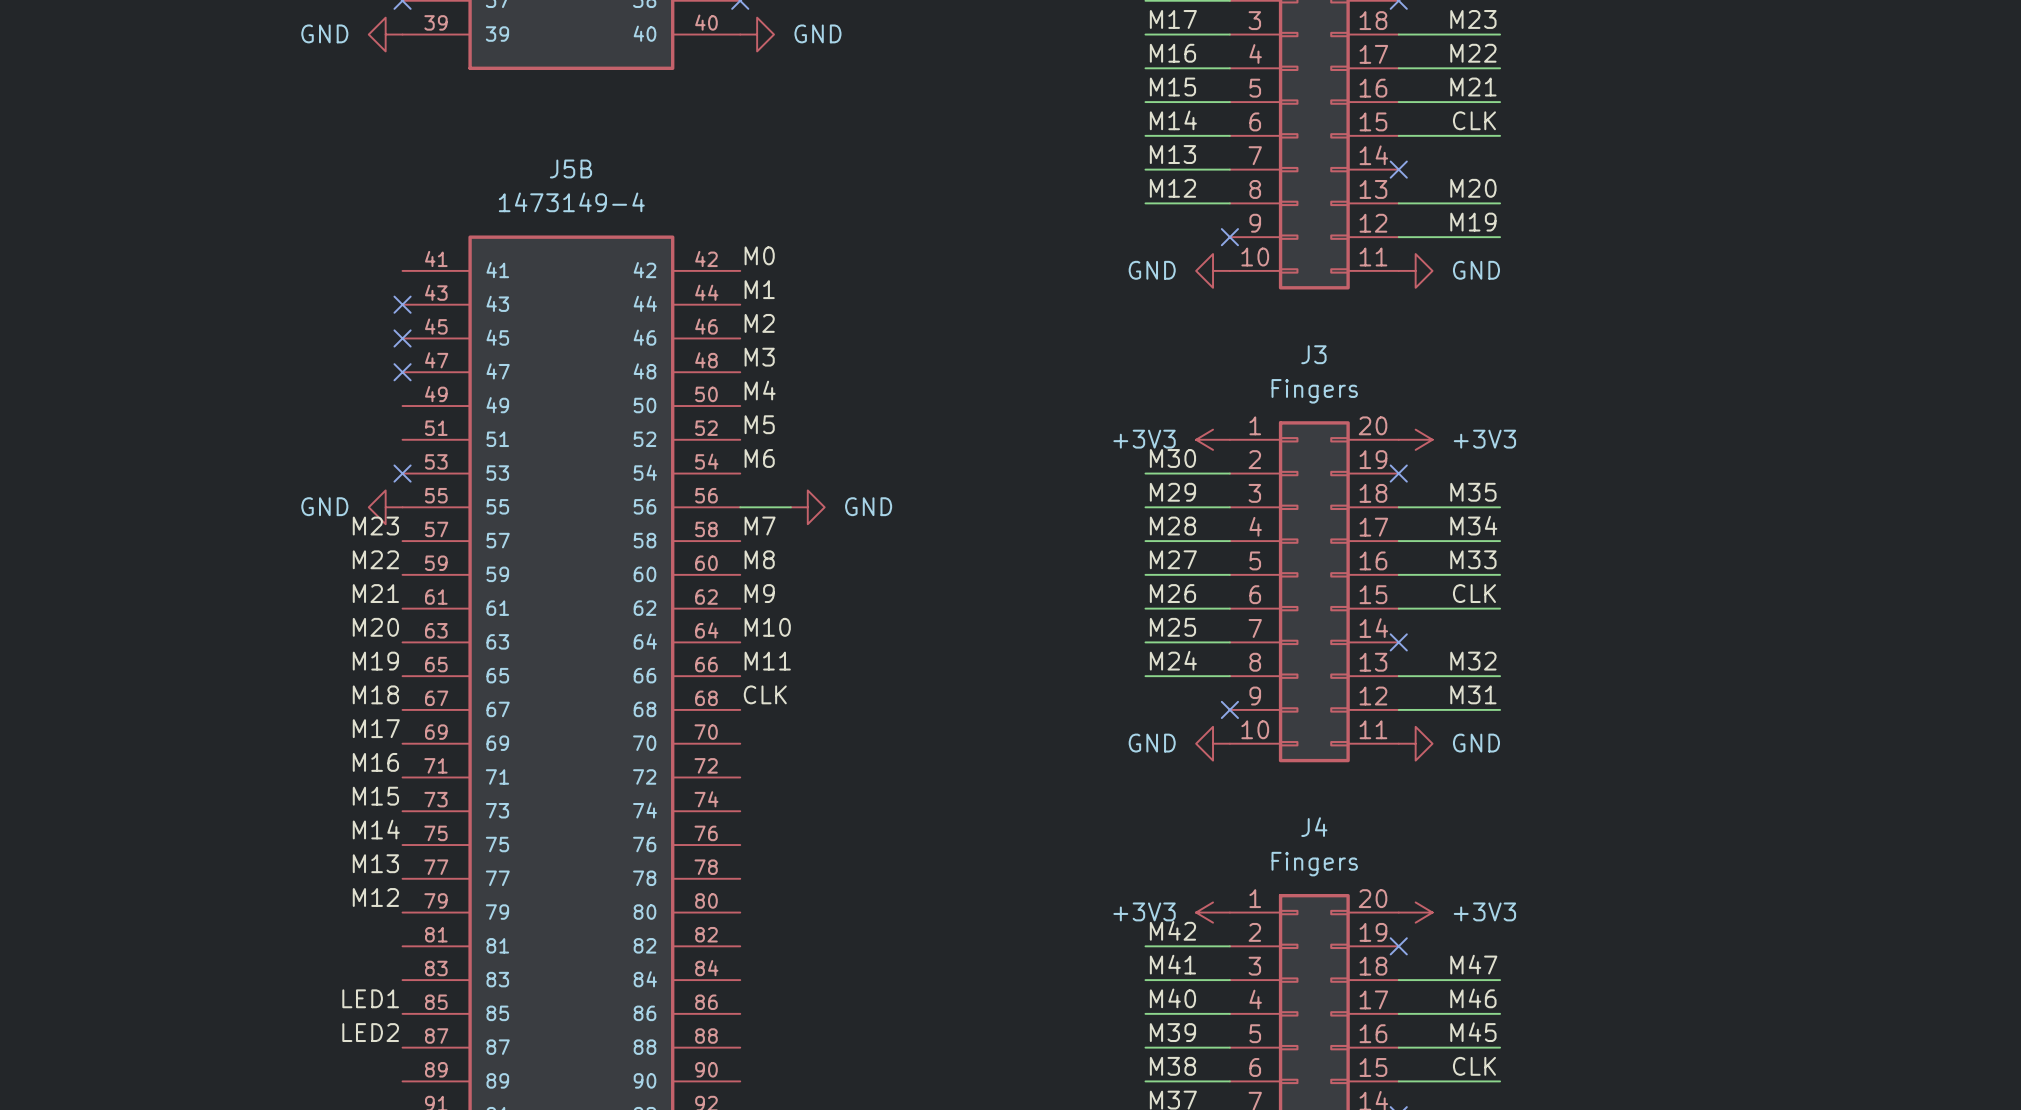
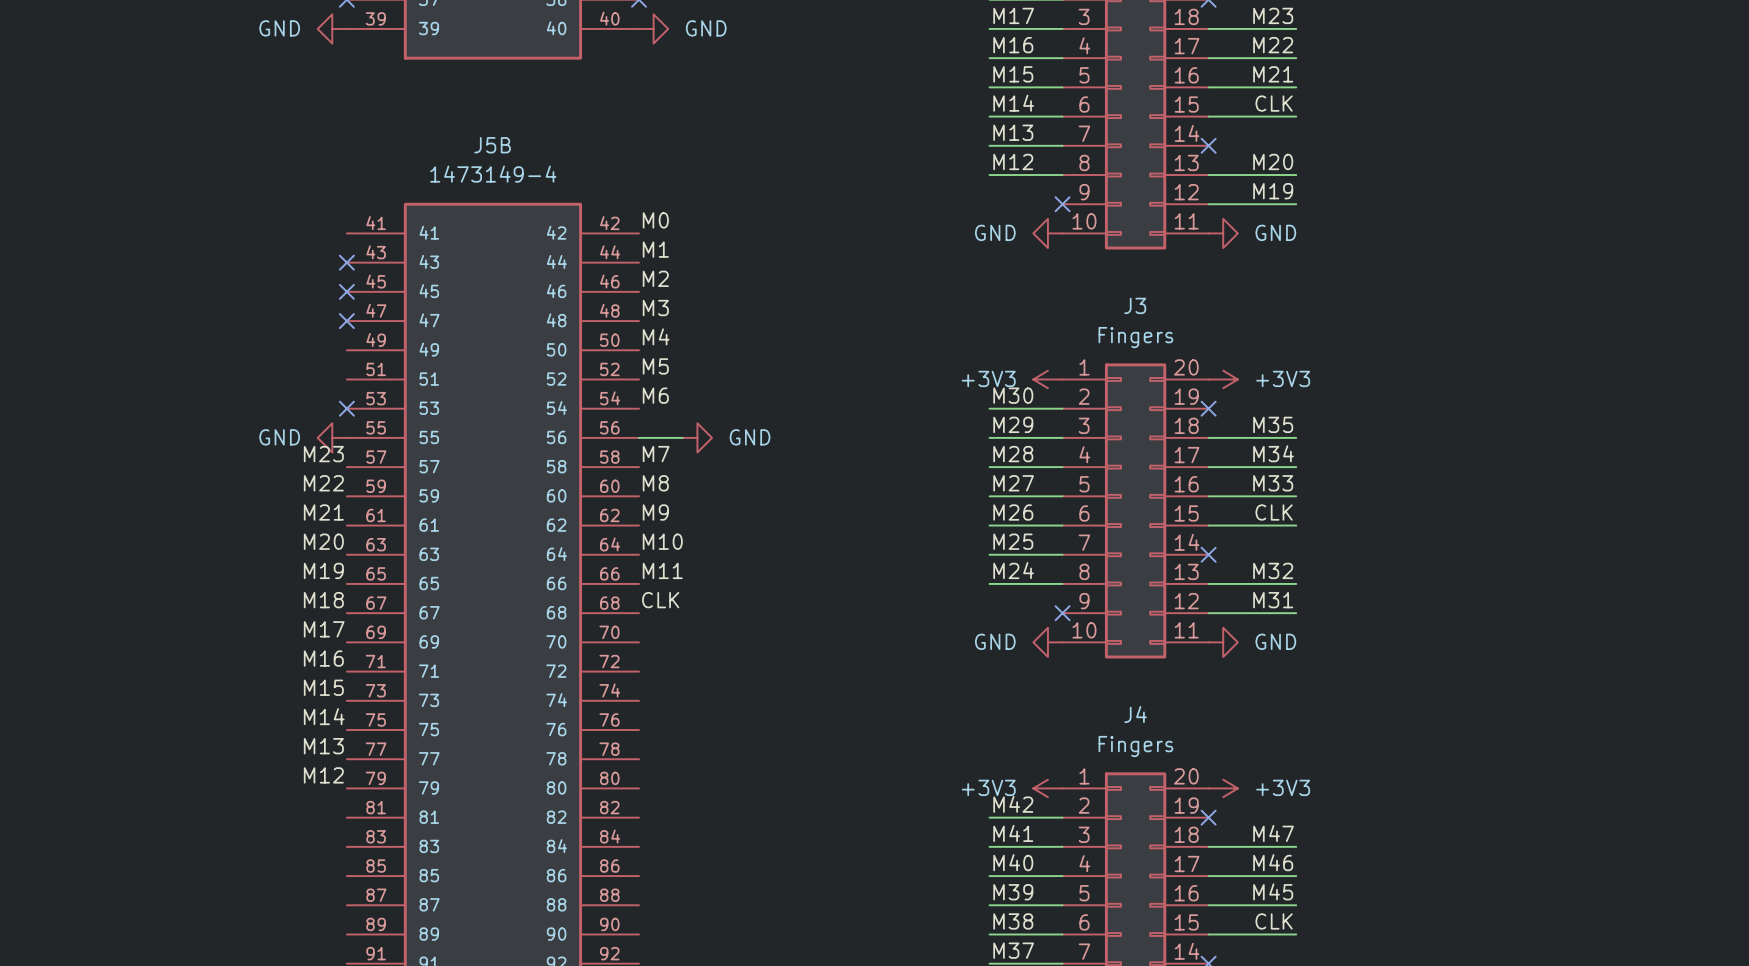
label: LED1 (370, 998) -> none
label: LED2 (370, 1032) -> none

